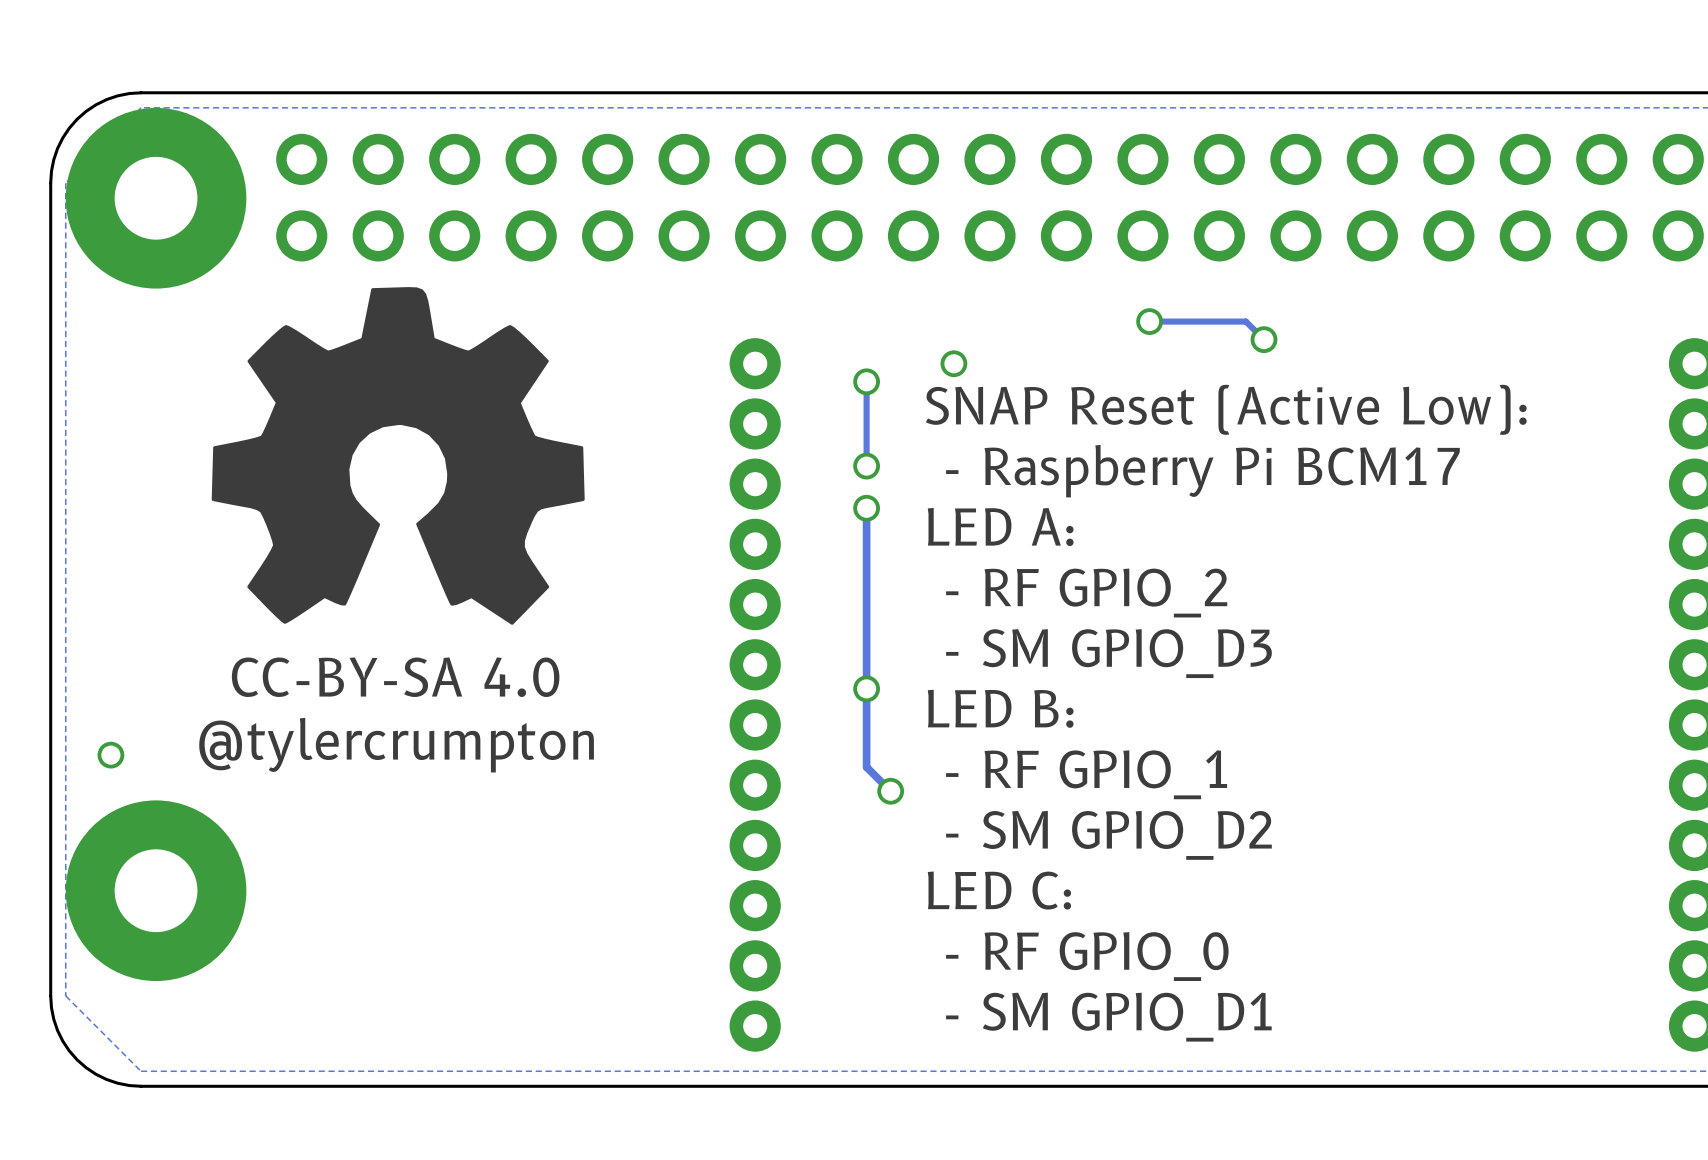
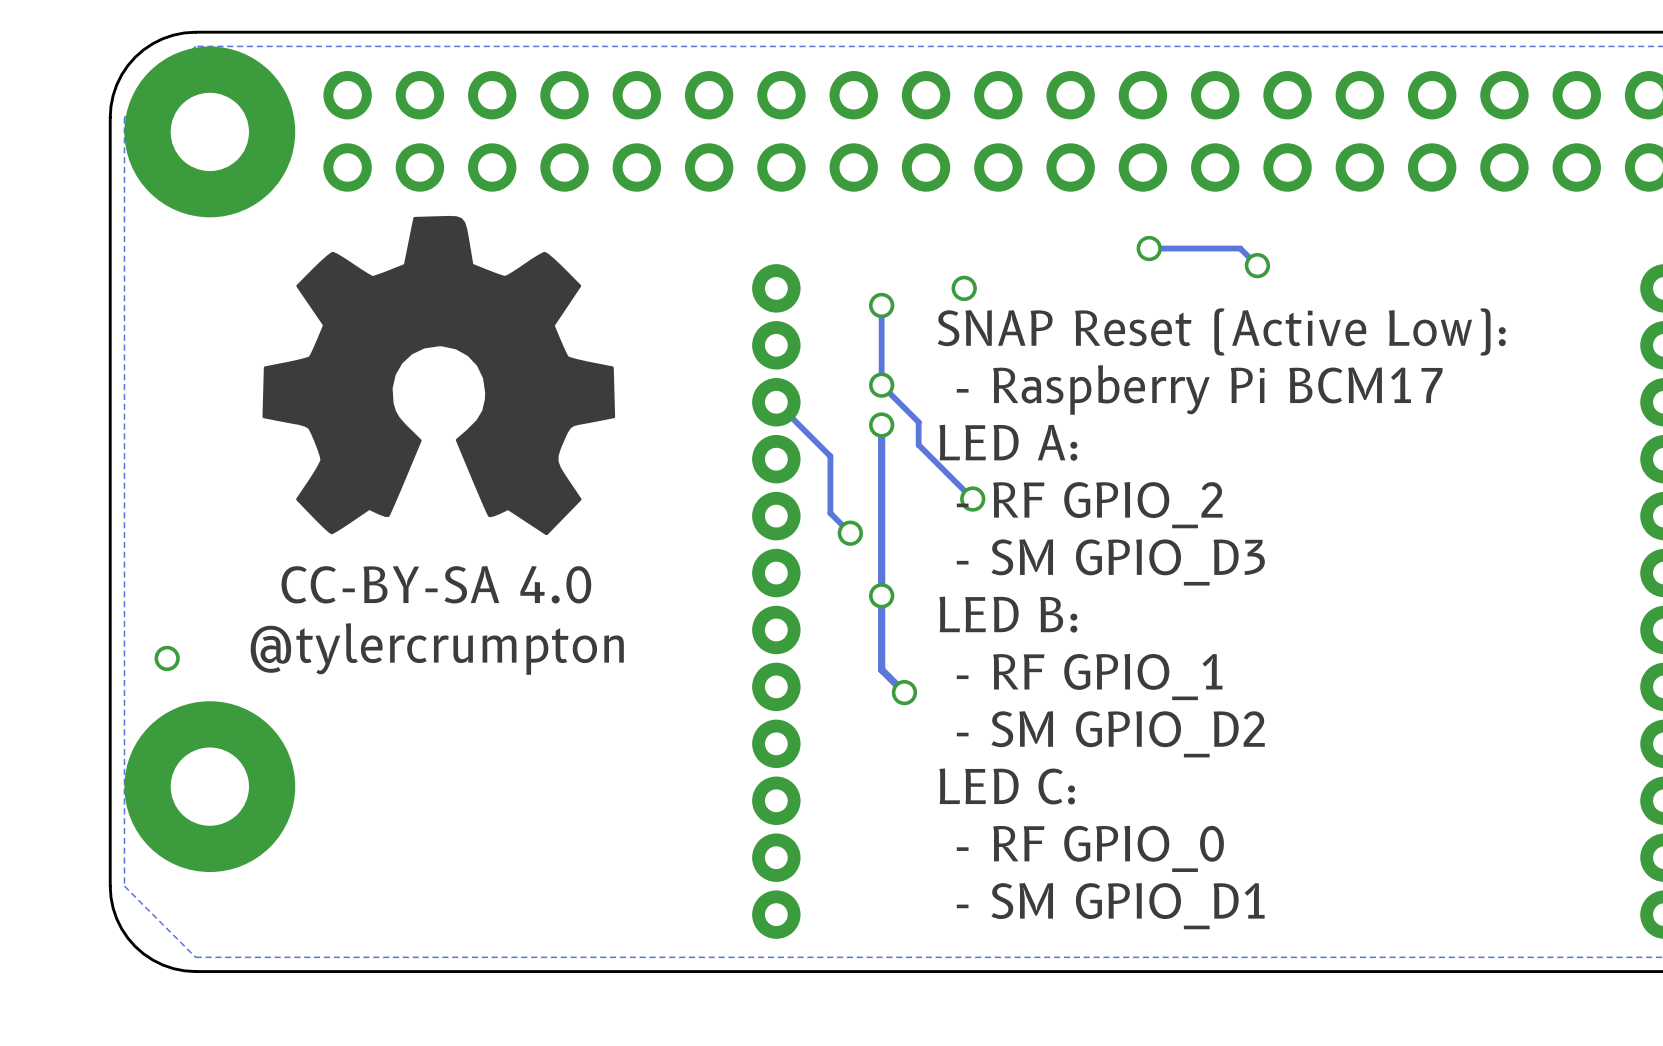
track: none -> (881, 385) (918, 422) (918, 444) (972, 499)
track: none -> (776, 402) (830, 456) (830, 513) (850, 533)
via: none -> (972, 499)
via: none -> (850, 533)

